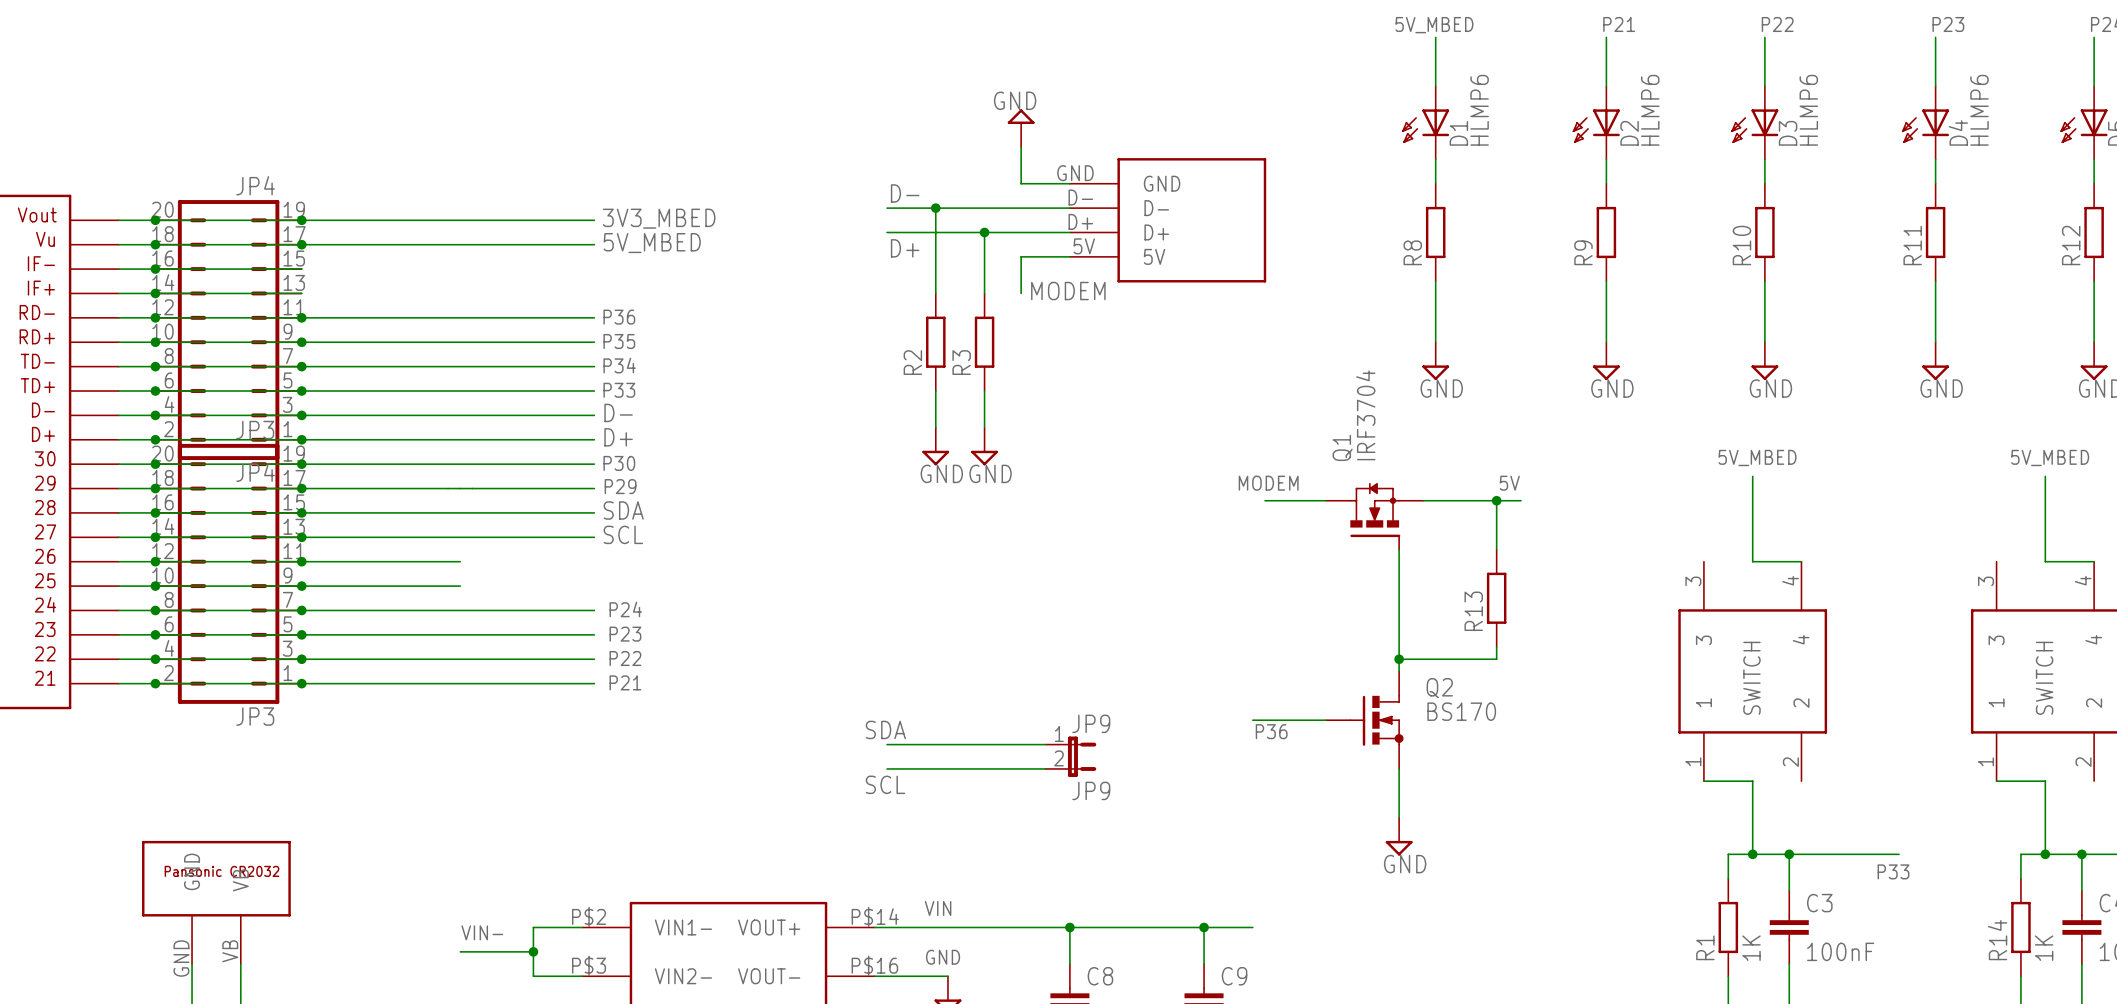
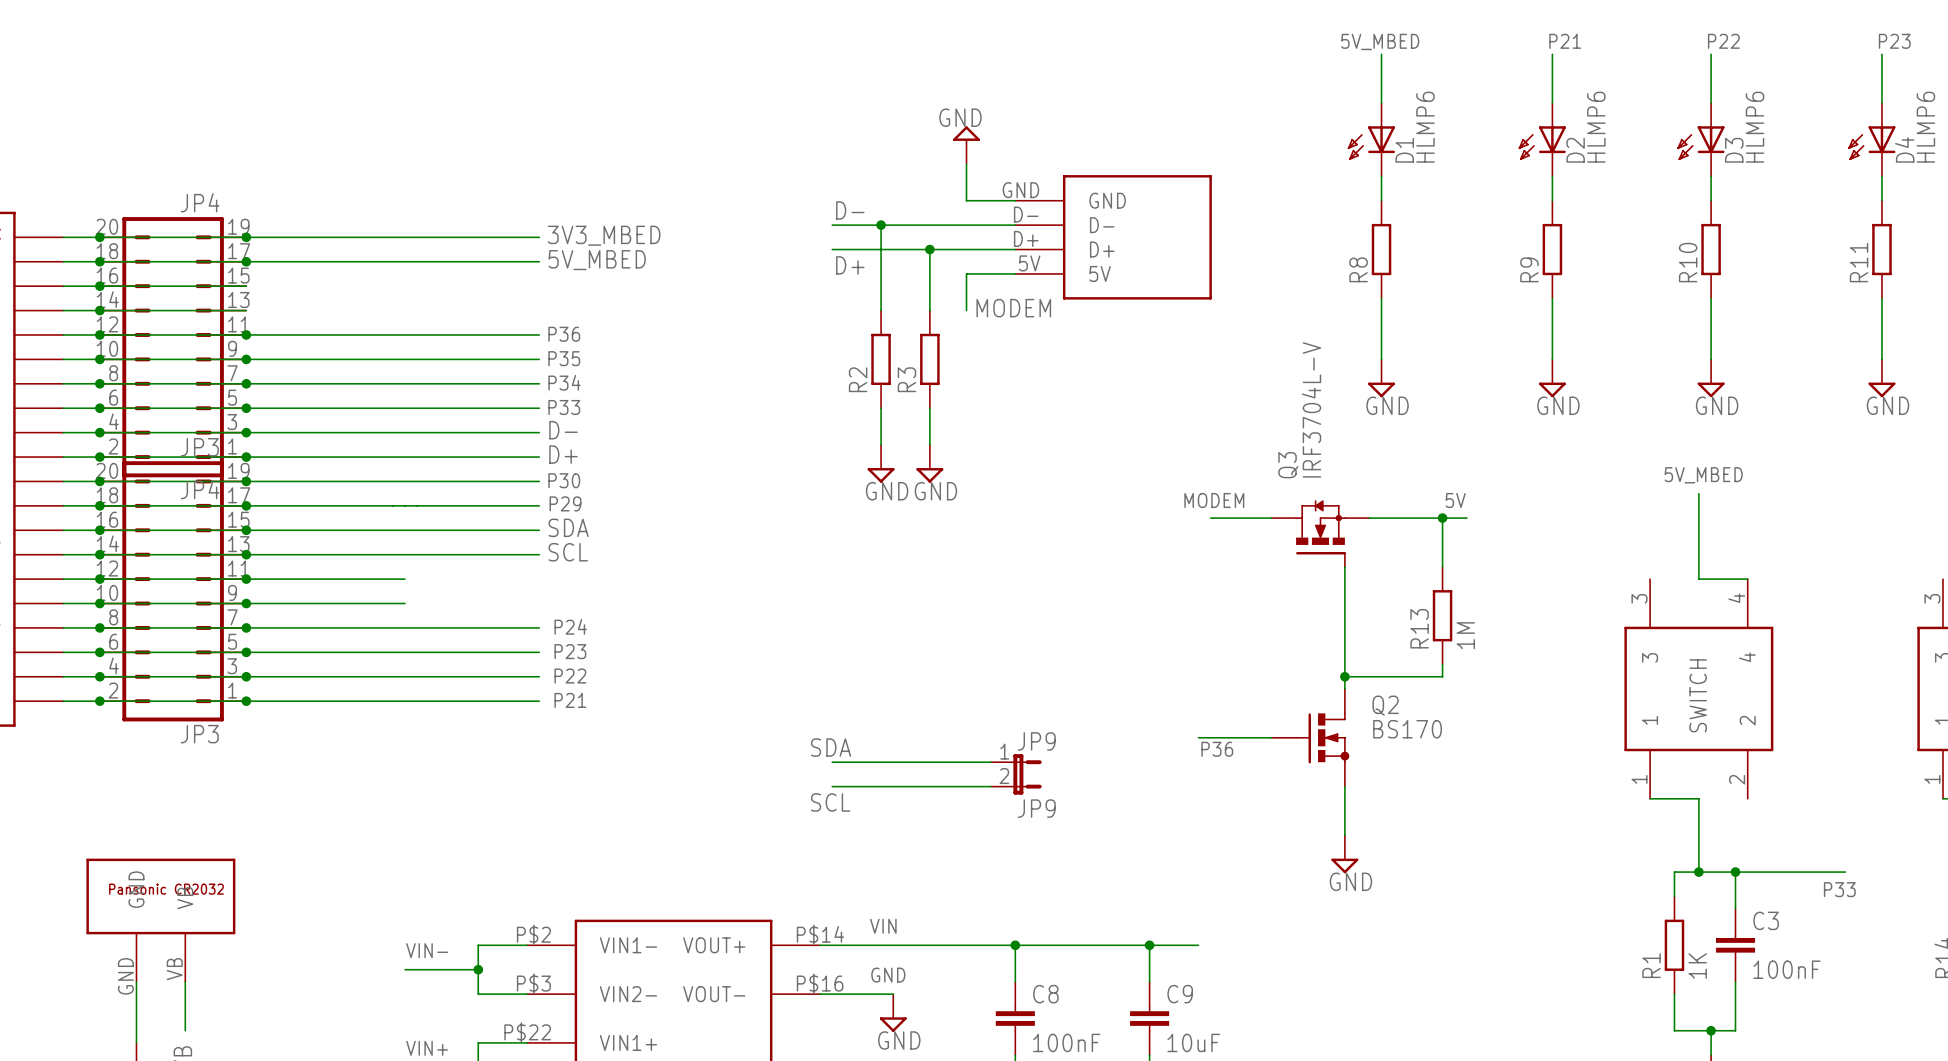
Q1 value: IRF3704 (1365, 415) -> IRF3704L-V (1311, 409)
Q1 name: Q1 (1342, 447) -> Q3 (1288, 465)
R13 value: none -> 1M (1465, 635)

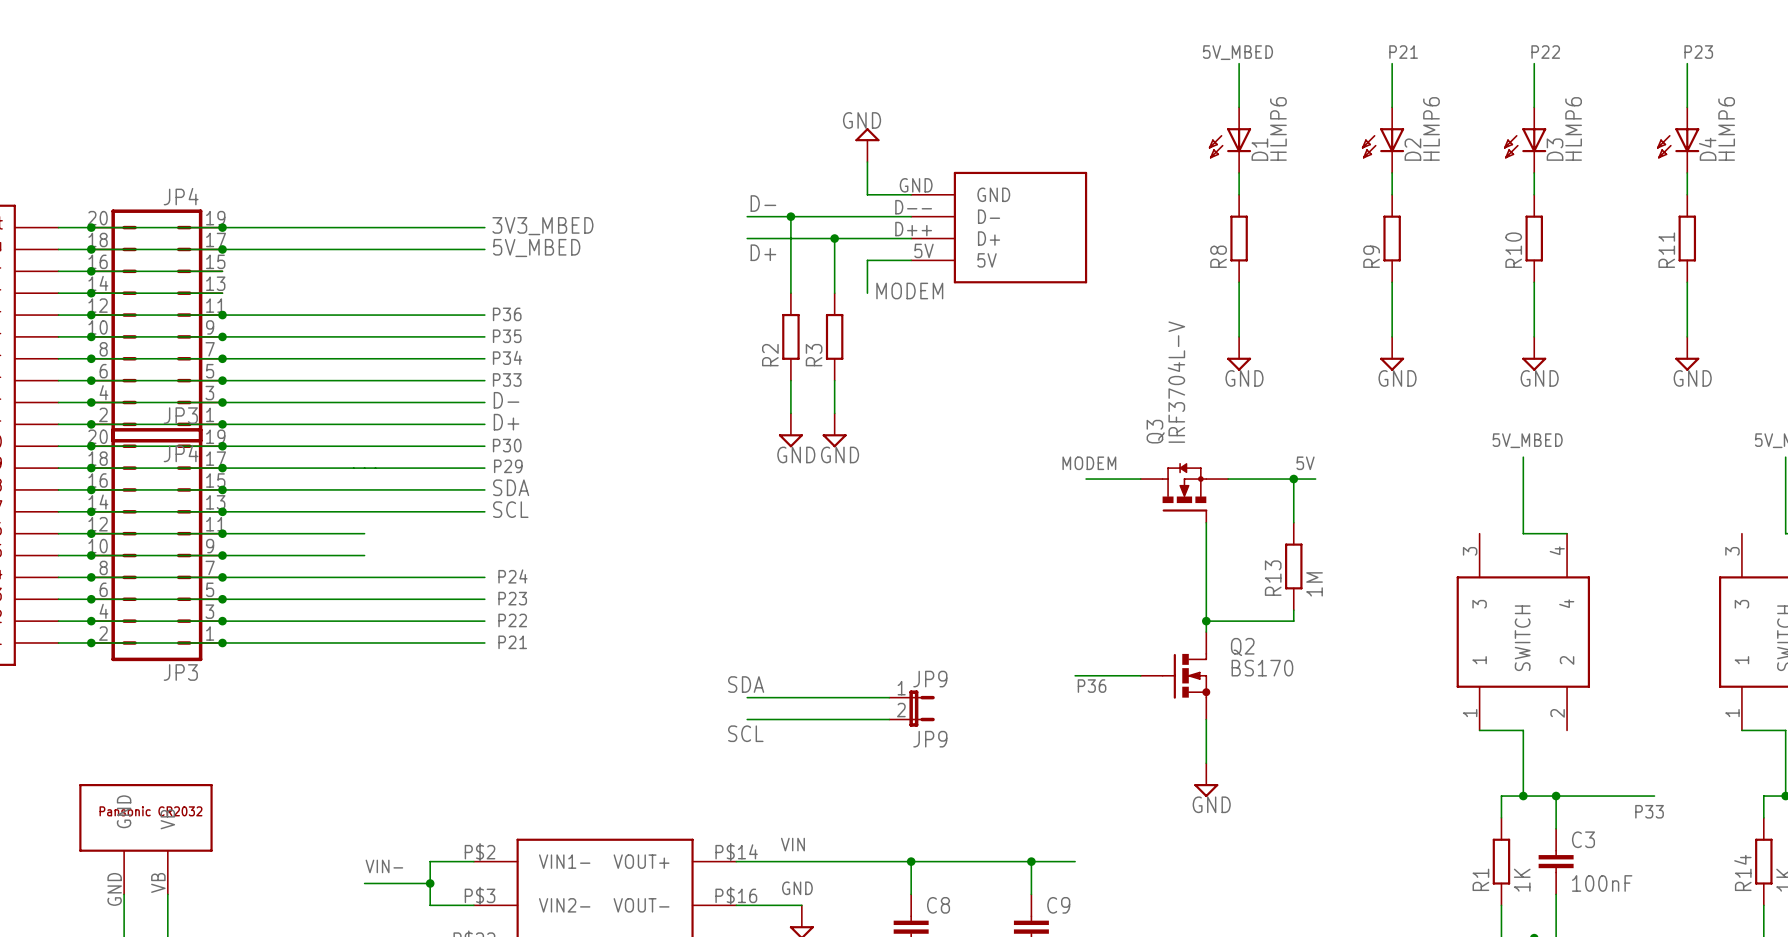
part pin number: D- (1026, 214) -> D-- (913, 207)
part pin number: D+ (1026, 238) -> D++ (913, 229)

